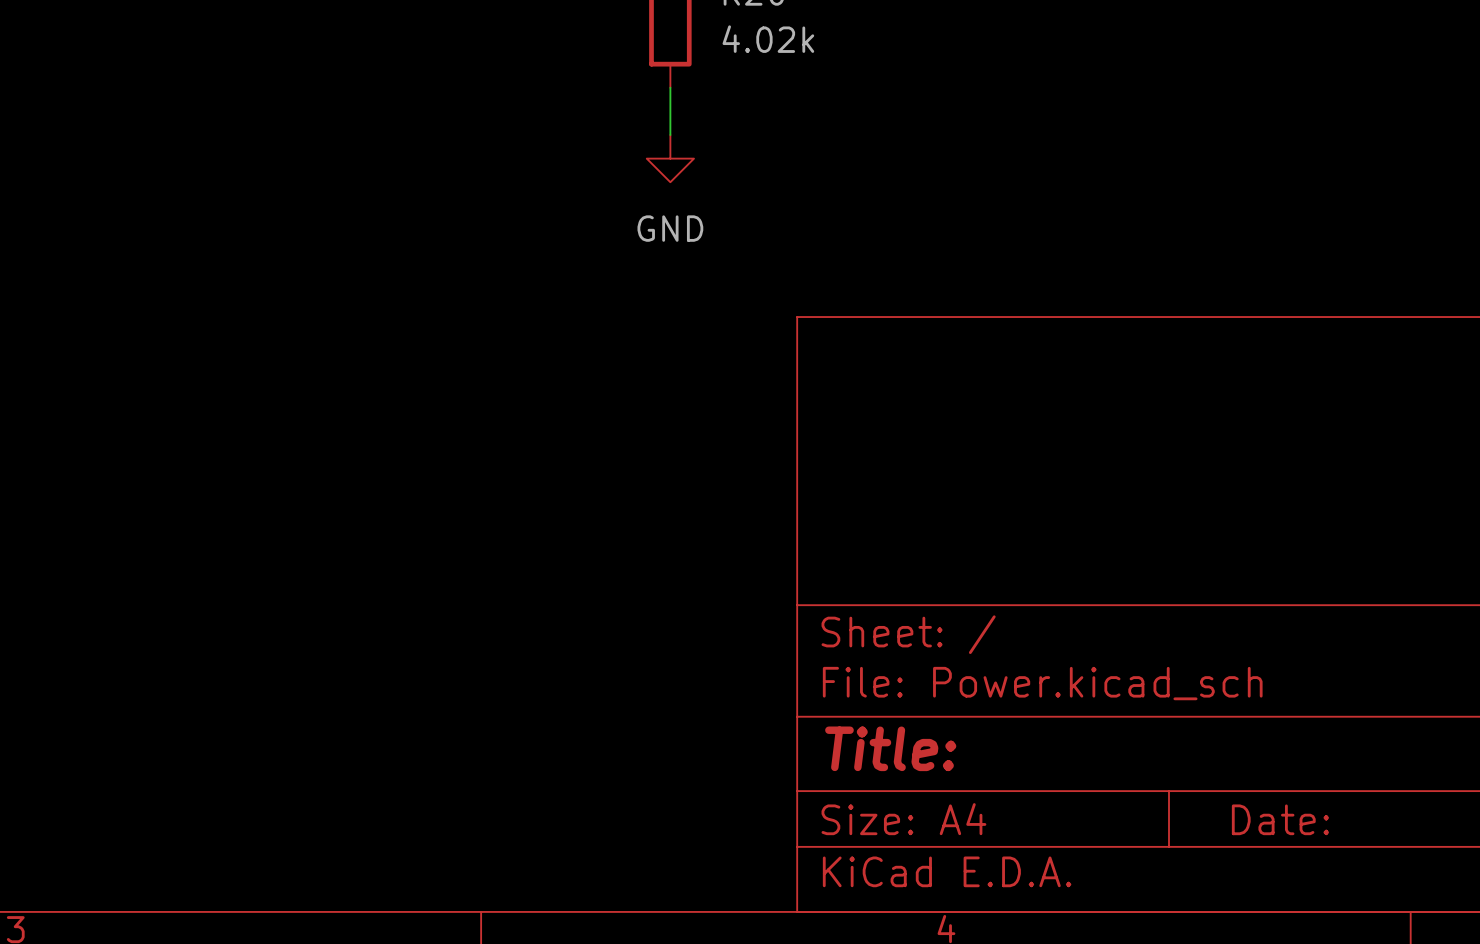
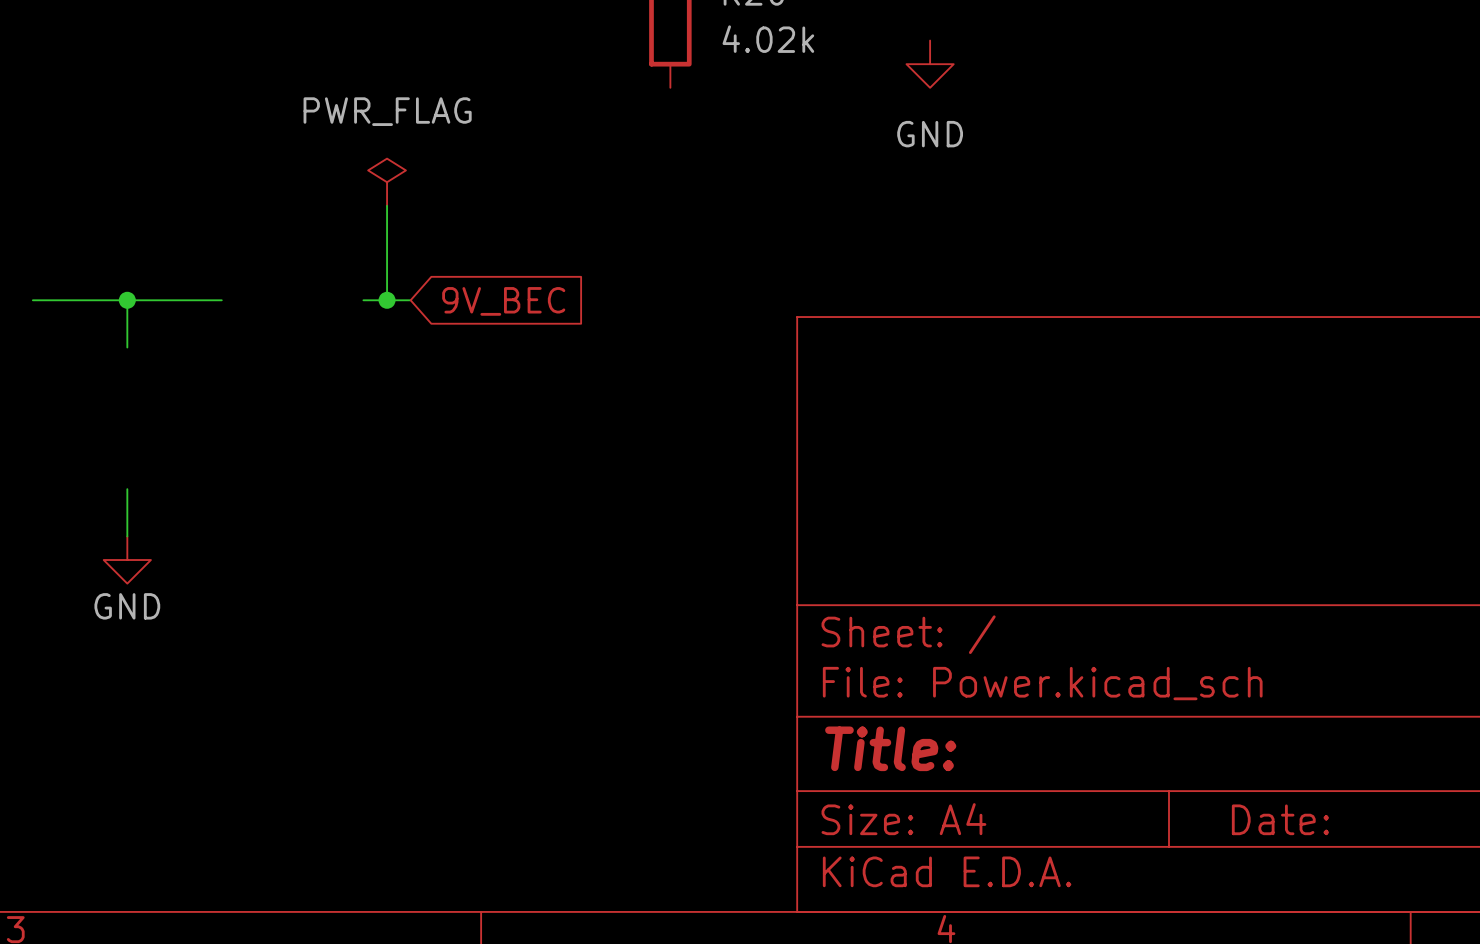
wire: (670, 87) (670, 135) -> none
power symbol position: GND (670, 158) -> GND (930, 64)
power symbol: none -> PWR_FLAG (387, 182)
wire: none -> (387, 205) (387, 300)
wire: none -> (32, 300) (221, 300)
wire: none -> (127, 300) (127, 347)
junction: none -> (127, 300)
wire: none -> (363, 300) (410, 300)
junction: none -> (387, 300)
global label: none -> 9V_BEC (503, 301)
wire: none -> (127, 489) (127, 536)
power symbol: none -> GND (127, 560)

